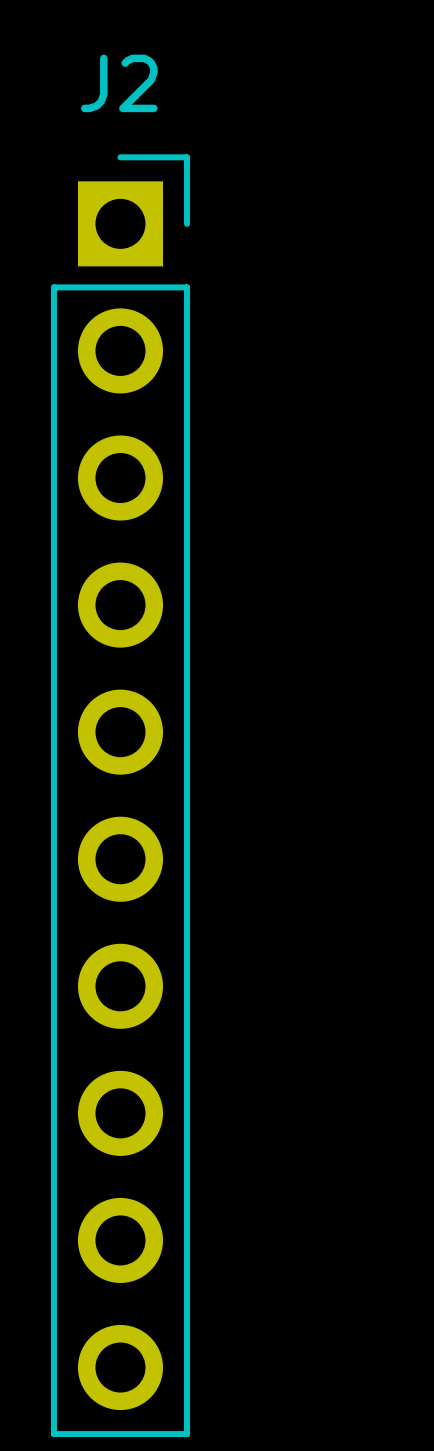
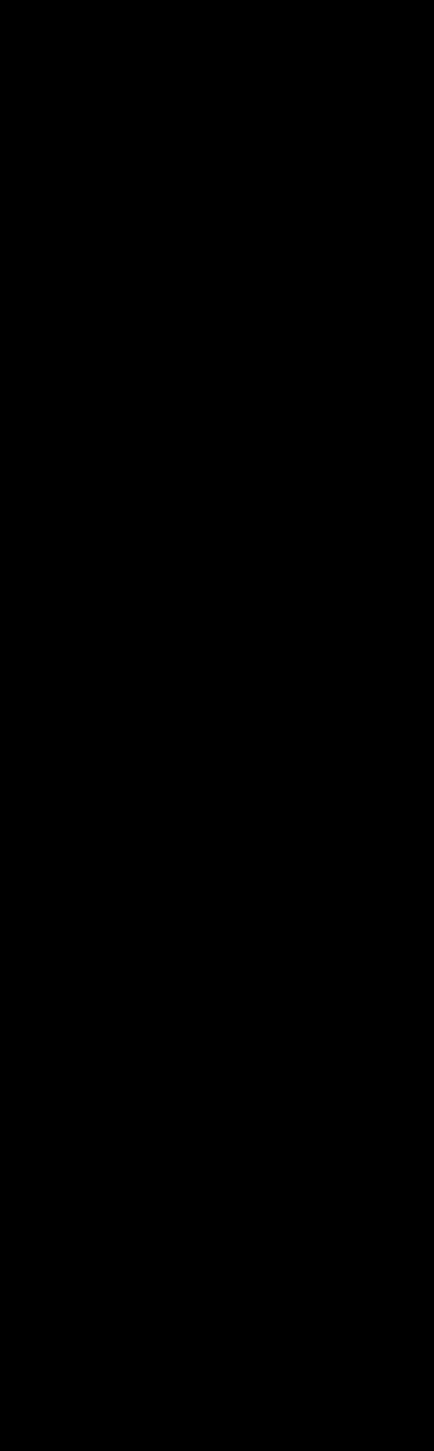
J2: (120, 795) -> none

